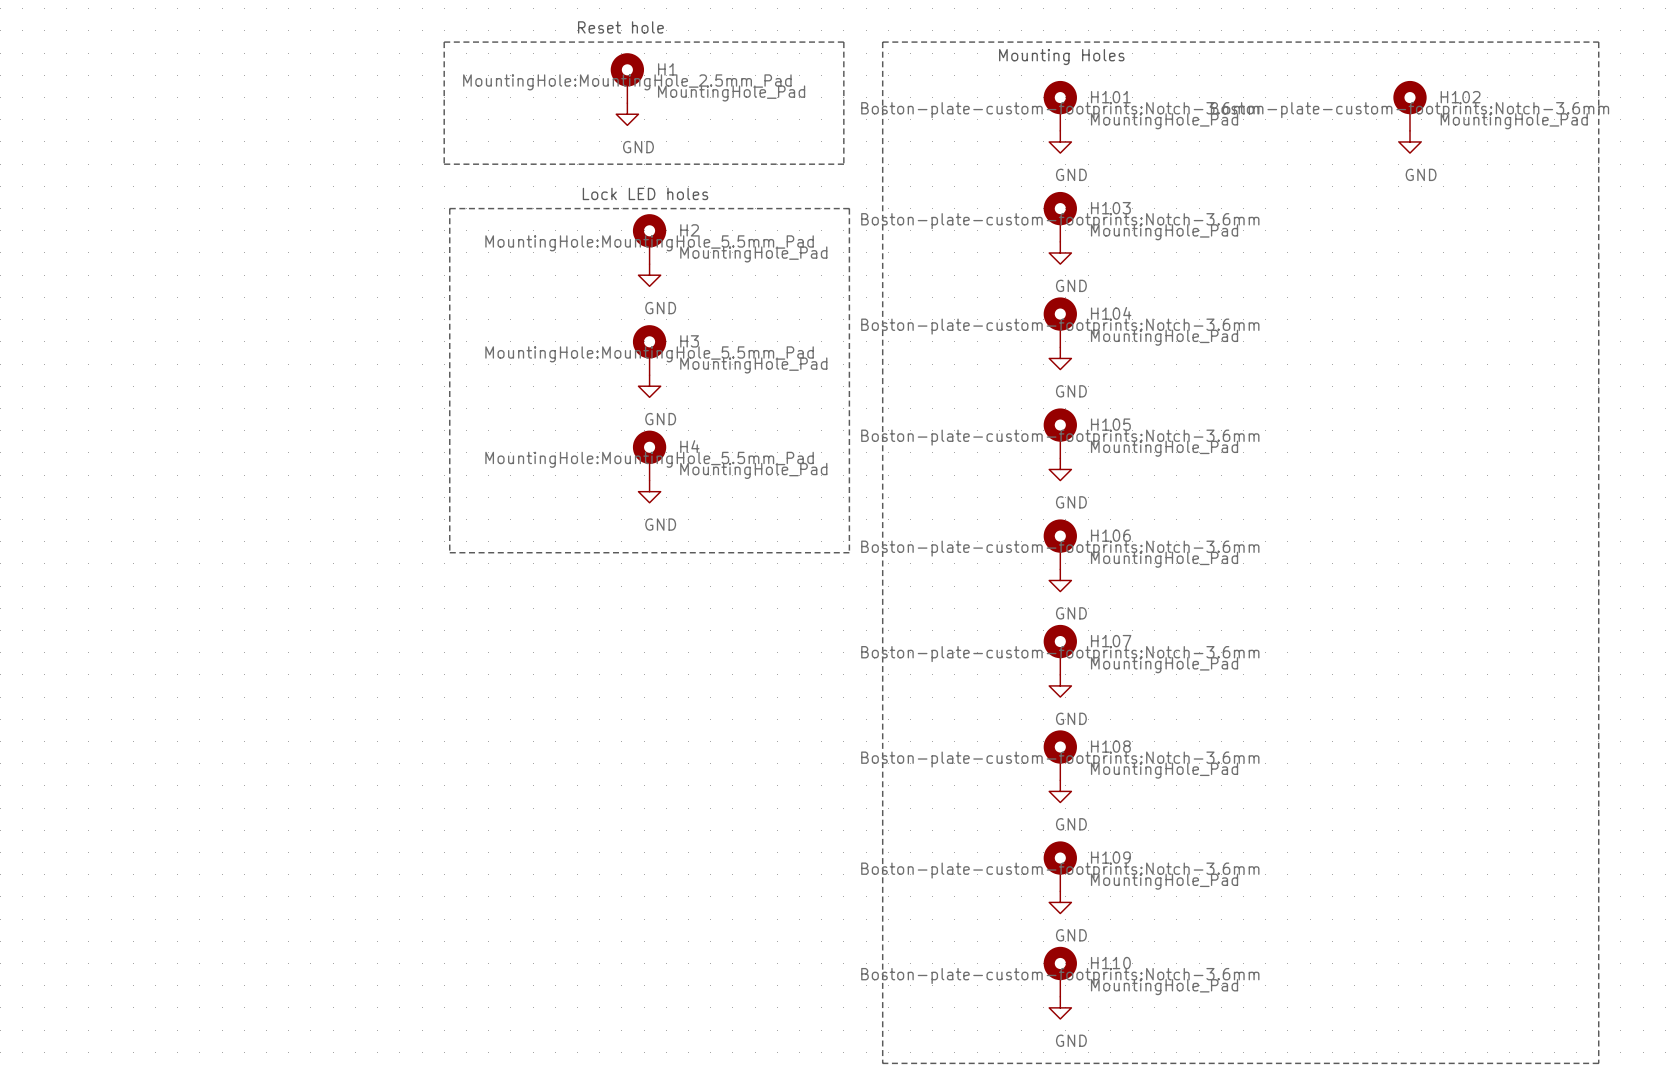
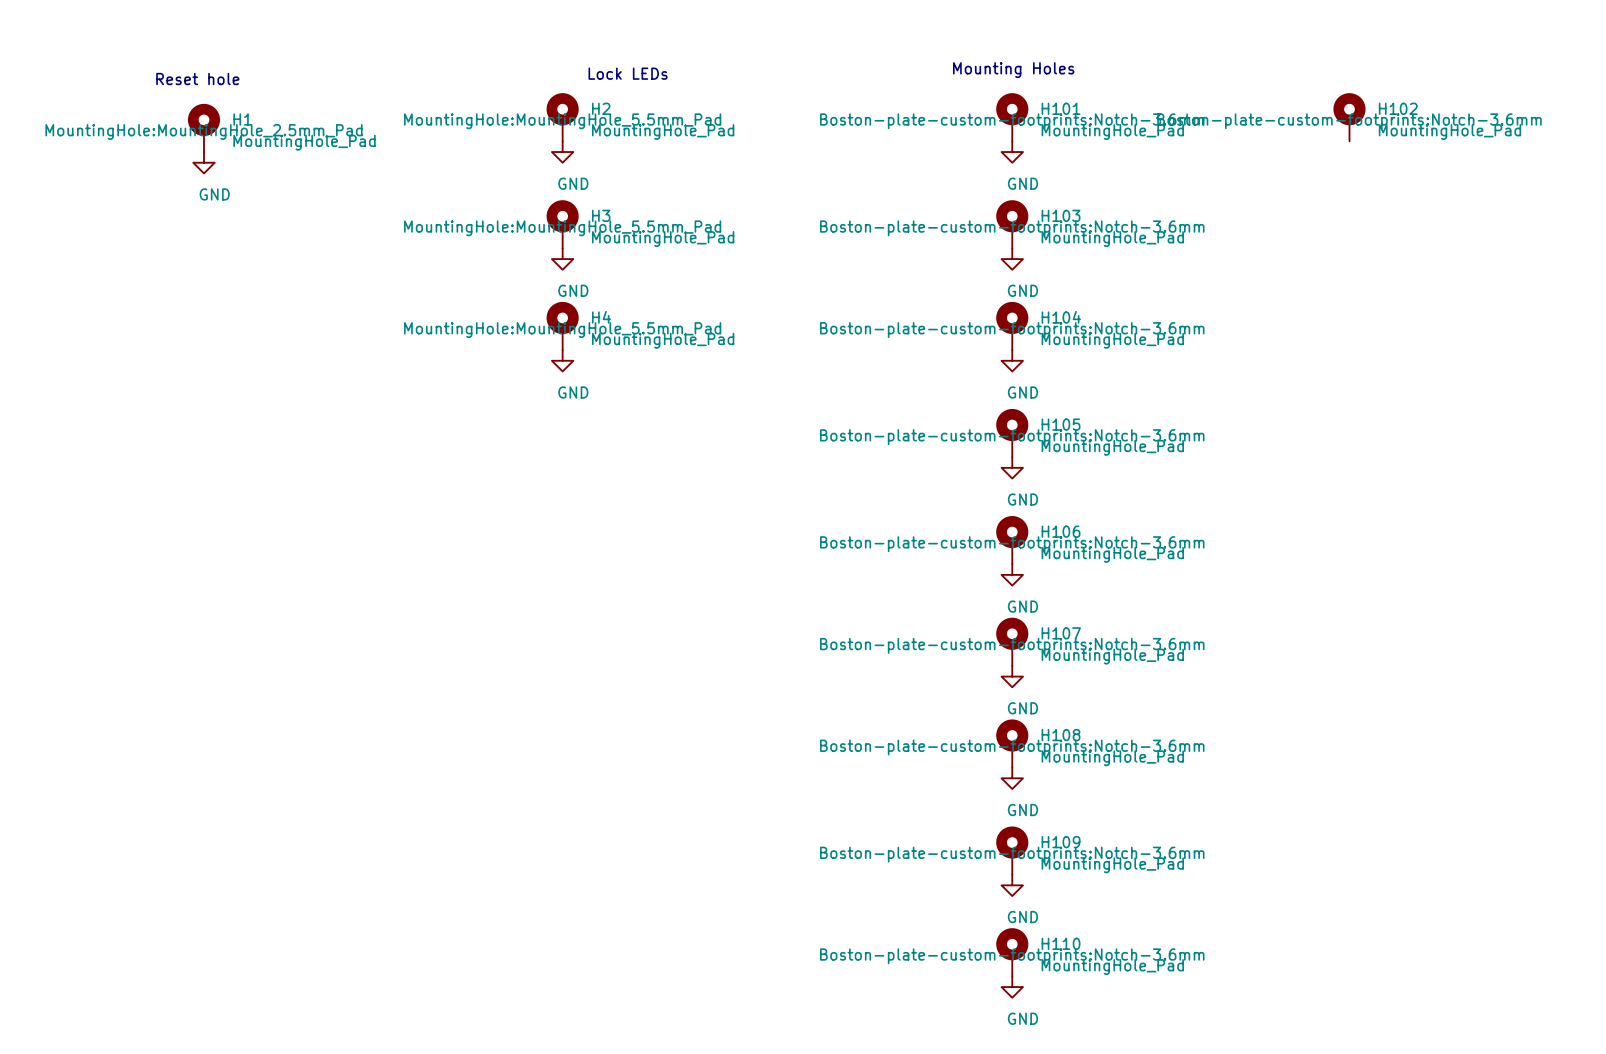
text: Reset hole (620, 27) -> none
line: (444, 42) (444, 164) (843, 164) (843, 42) (444, 42) -> none
line: (882, 42) (1598, 42) (1598, 1063) (882, 1063) (882, 42) -> none
text: none -> Lock LEDs (628, 73)
text: none -> Reset hole (197, 79)
H1 position: (627, 78) -> (204, 127)
power symbol position: GND (627, 114) -> GND (562, 152)
power symbol: GND (1410, 141) -> none
power symbol: none -> GND (204, 162)
text: Lock LED holes (645, 193) -> none
line: (449, 208) (449, 552) (849, 552) (849, 208) (449, 208) -> none
H2 position: (649, 239) -> (562, 117)
power symbol: none -> GND (562, 259)
power symbol: GND (649, 275) -> none
H3 position: (649, 350) -> (562, 224)
power symbol: none -> GND (562, 360)
power symbol: GND (649, 386) -> none
H4 position: (649, 455) -> (562, 325)
power symbol: GND (649, 491) -> none

